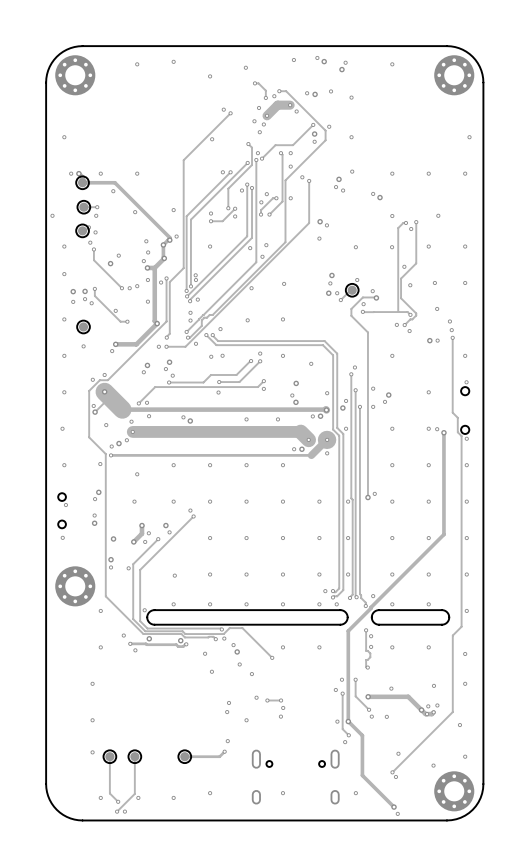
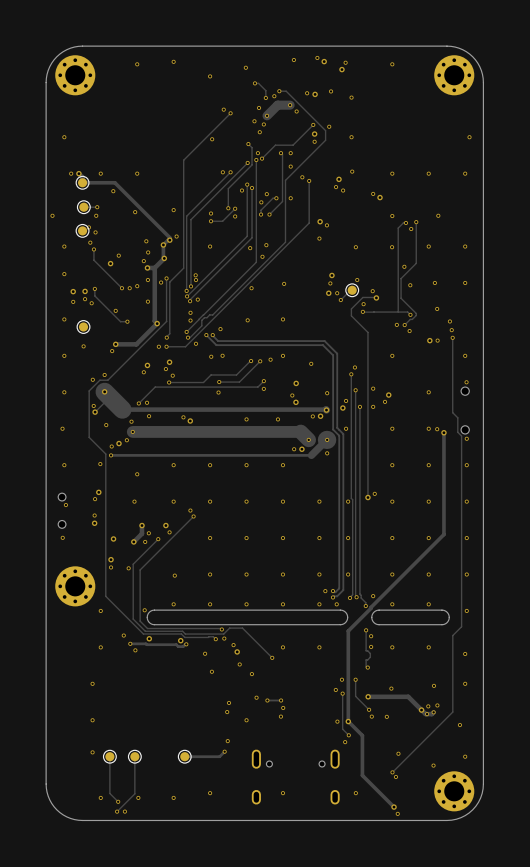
via position: (260, 353) -> (270, 359)

